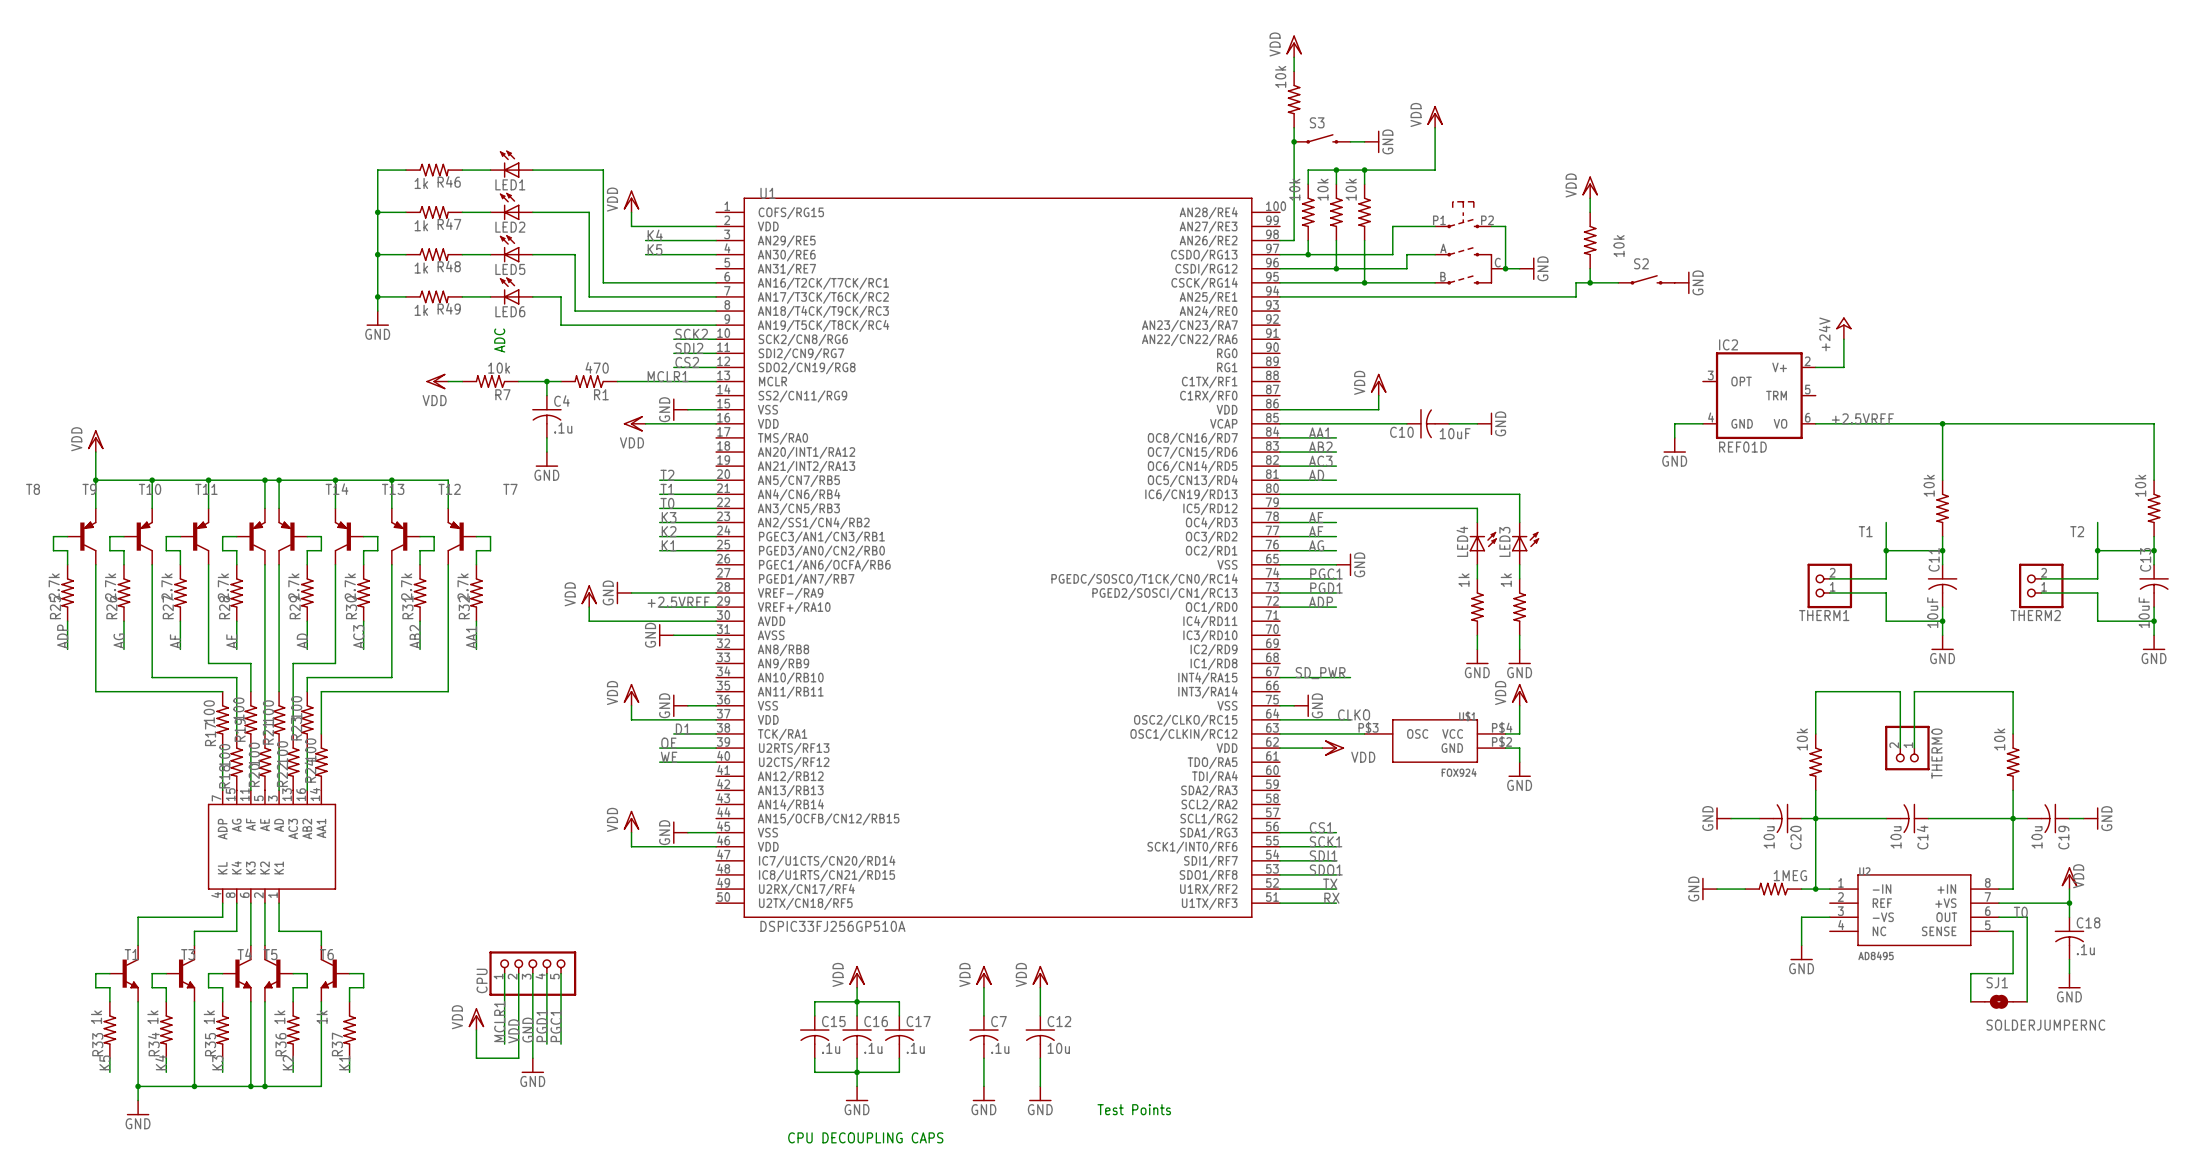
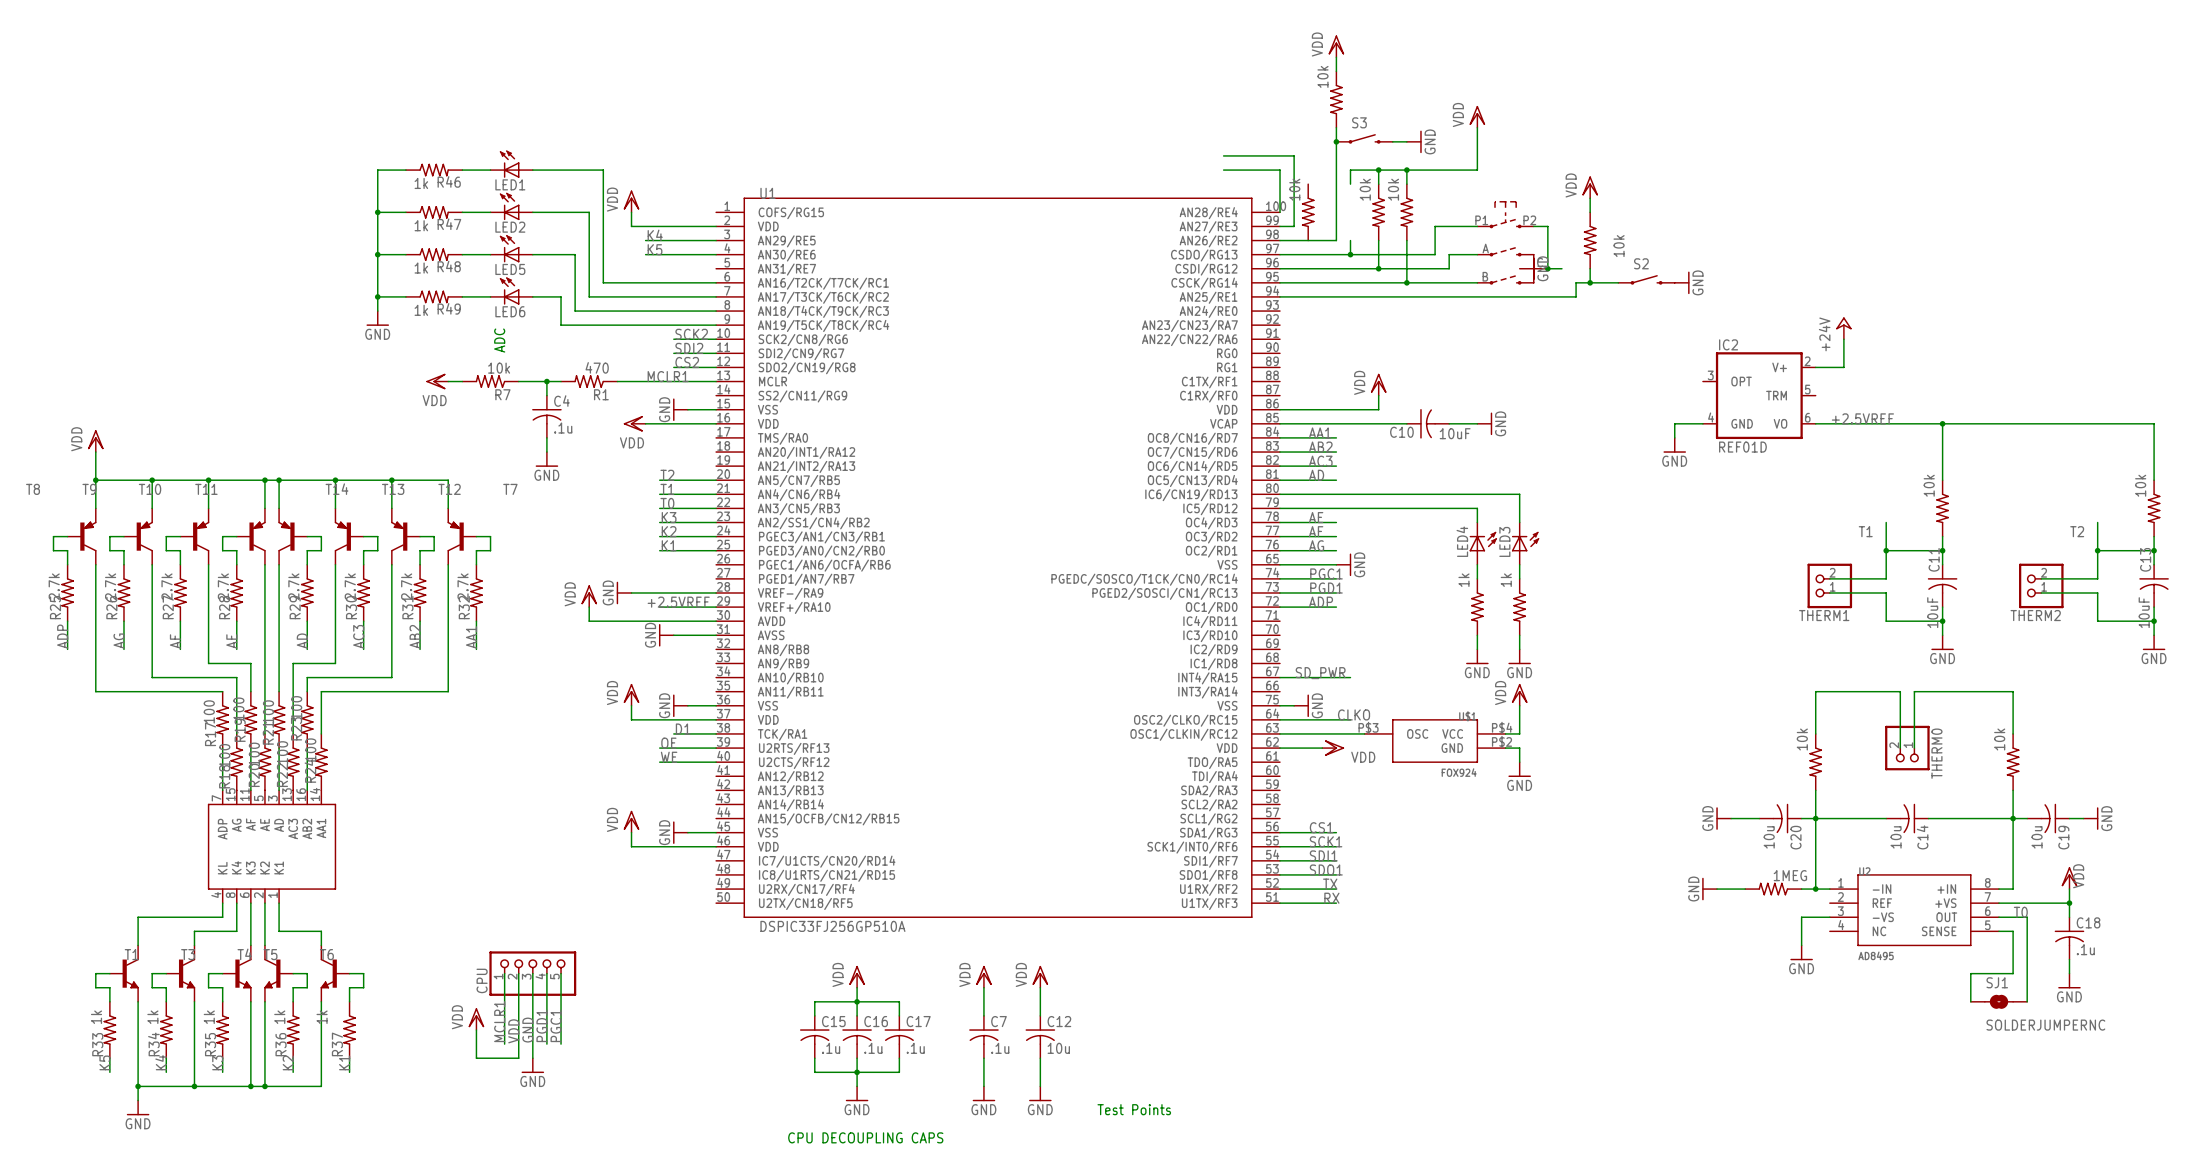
power symbol position: VDD (1294, 46) -> VDD (1336, 46)
wire: (1294, 57) (1294, 71) -> (1336, 57) (1336, 71)
part position: (1294, 99) -> (1336, 99)
power symbol position: VDD (1435, 116) -> VDD (1477, 116)
wire: (1294, 127) (1294, 155) -> (1223, 155) (1294, 155)
wire: (1435, 127) (1435, 170) -> (1477, 127) (1477, 170) (1435, 170)
S3 position: (1322, 138) -> (1364, 138)
junction: (1294, 141) -> none
junction: none -> (1336, 141)
wire: (1350, 141) (1364, 141) -> (1392, 141) (1406, 141)
power symbol position: GND (1371, 141) -> GND (1414, 141)
wire: none -> (1223, 170) (1280, 170) (1280, 212)
junction: (1336, 170) -> none
wire: (1350, 170) (1308, 170) (1308, 184) -> (1350, 170) (1350, 184)
wire: (1364, 170) (1364, 184) -> (1406, 170) (1406, 184)
junction position: (1364, 170) -> (1378, 170)
wire: none -> (1378, 170) (1378, 184)
junction: none -> (1406, 170)
wire: none -> (1336, 184) (1336, 240) (1294, 240)
part: 10k (1336, 212) -> none
part position: (1364, 212) -> (1378, 212)
part: none -> 10k (1406, 212)
part position: (1463, 214) -> (1505, 214)
wire: (1294, 226) (1294, 240) -> (1294, 226) (1280, 226)
wire: (1435, 226) (1392, 226) (1392, 254) -> (1406, 240) (1406, 254) (1392, 254)
wire: none -> (1477, 226) (1435, 226) (1435, 254)
wire: (1491, 226) (1505, 226) (1505, 268) (1519, 268) -> (1533, 226) (1547, 226) (1547, 268) (1561, 268)
wire: (1308, 240) (1308, 254) -> (1350, 240) (1350, 254)
wire: (1336, 240) (1336, 268) -> (1378, 240) (1378, 268)
wire: (1364, 240) (1364, 282) -> (1336, 127) (1336, 170)
junction: (1308, 254) -> none
junction: none -> (1350, 254)
wire: none -> (1477, 254) (1449, 254) (1449, 268) (1406, 268) (1406, 282)
part position: (1470, 265) -> (1512, 265)
junction: (1336, 268) -> none
junction: none -> (1378, 268)
junction: (1505, 268) -> none
junction: none -> (1547, 268)
junction: (1364, 282) -> none
junction: none -> (1406, 282)
wire: none -> (1435, 282) (1477, 282)

